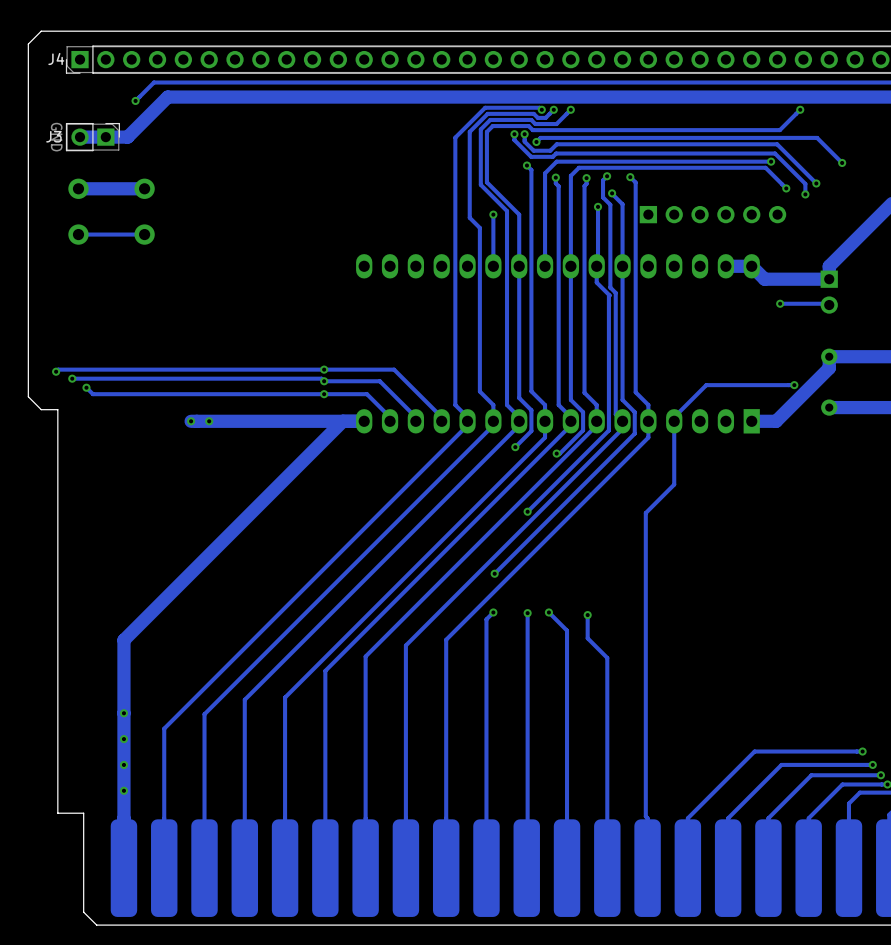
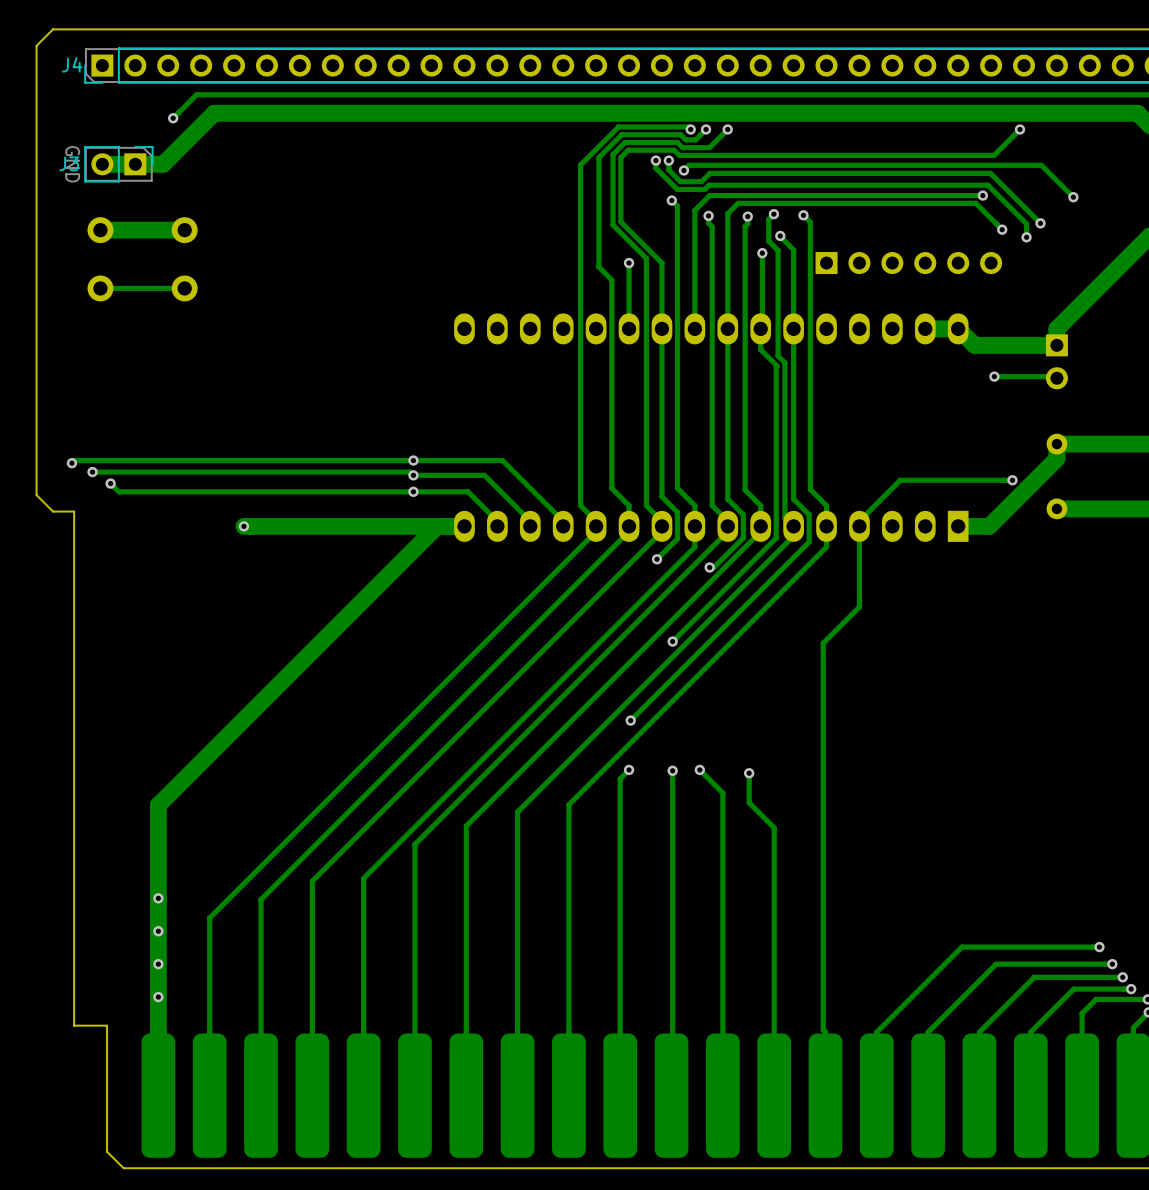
via: (209, 421) -> none

